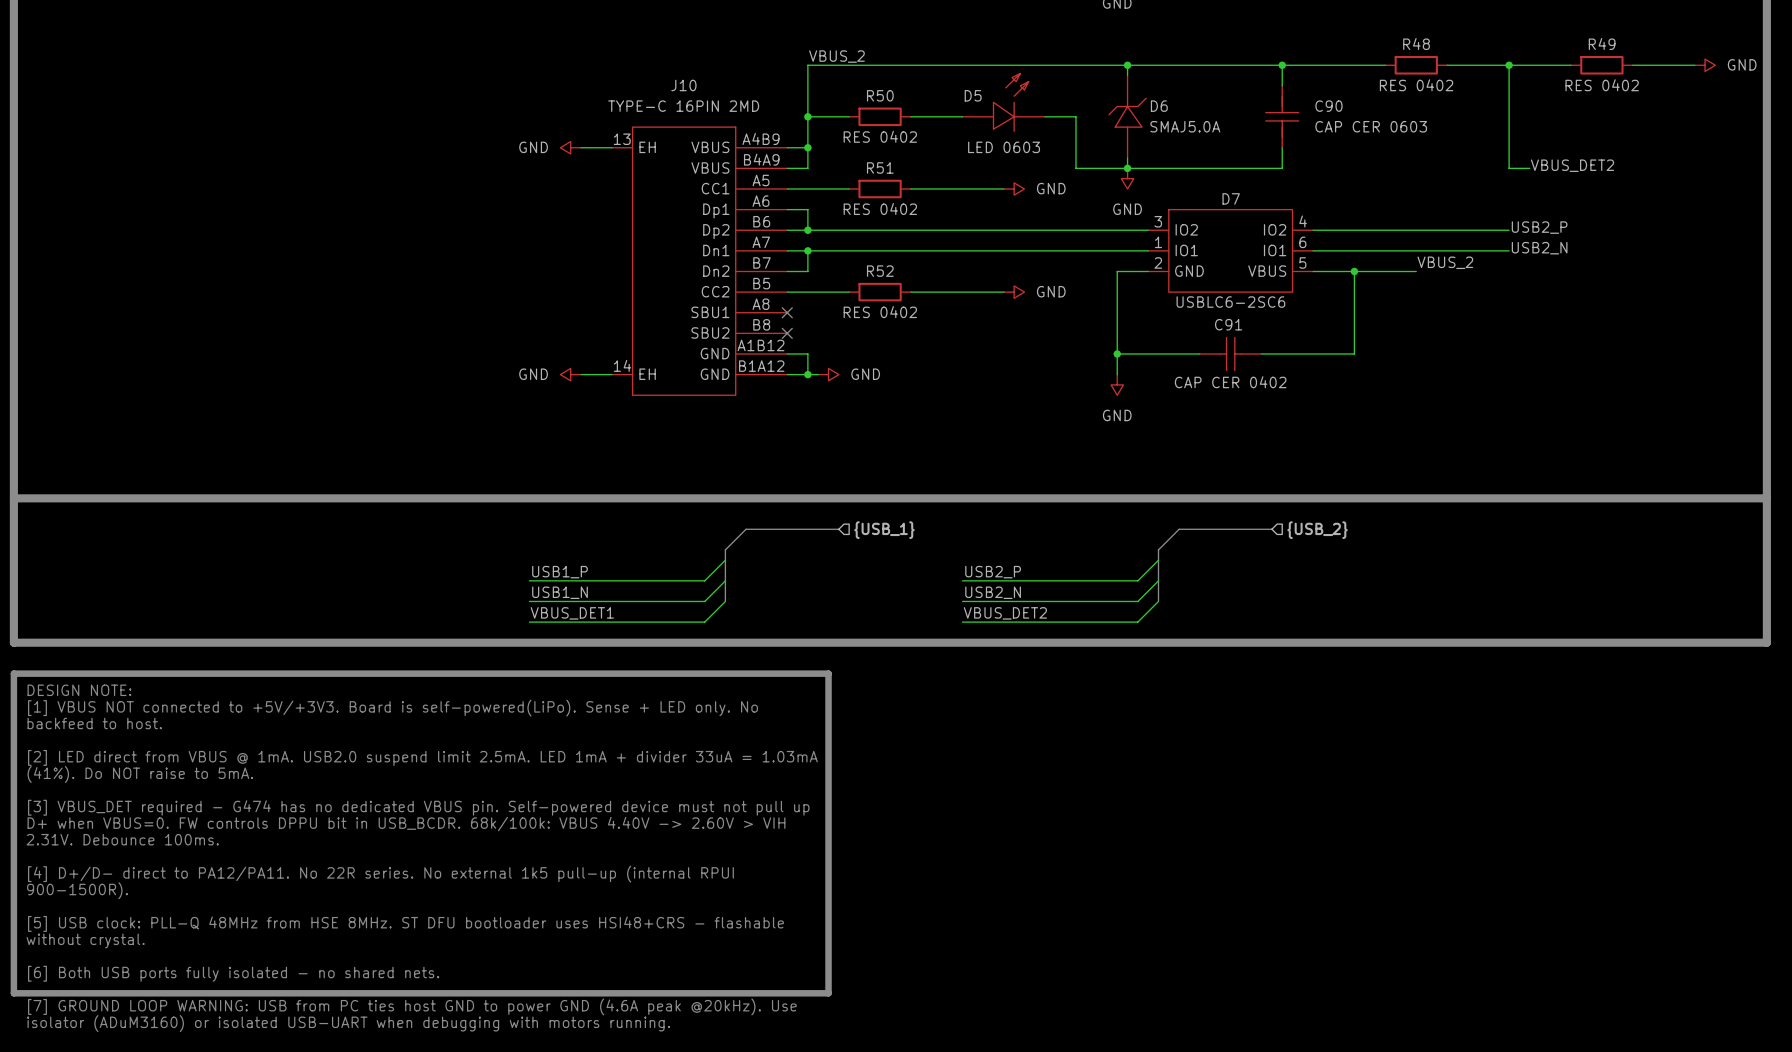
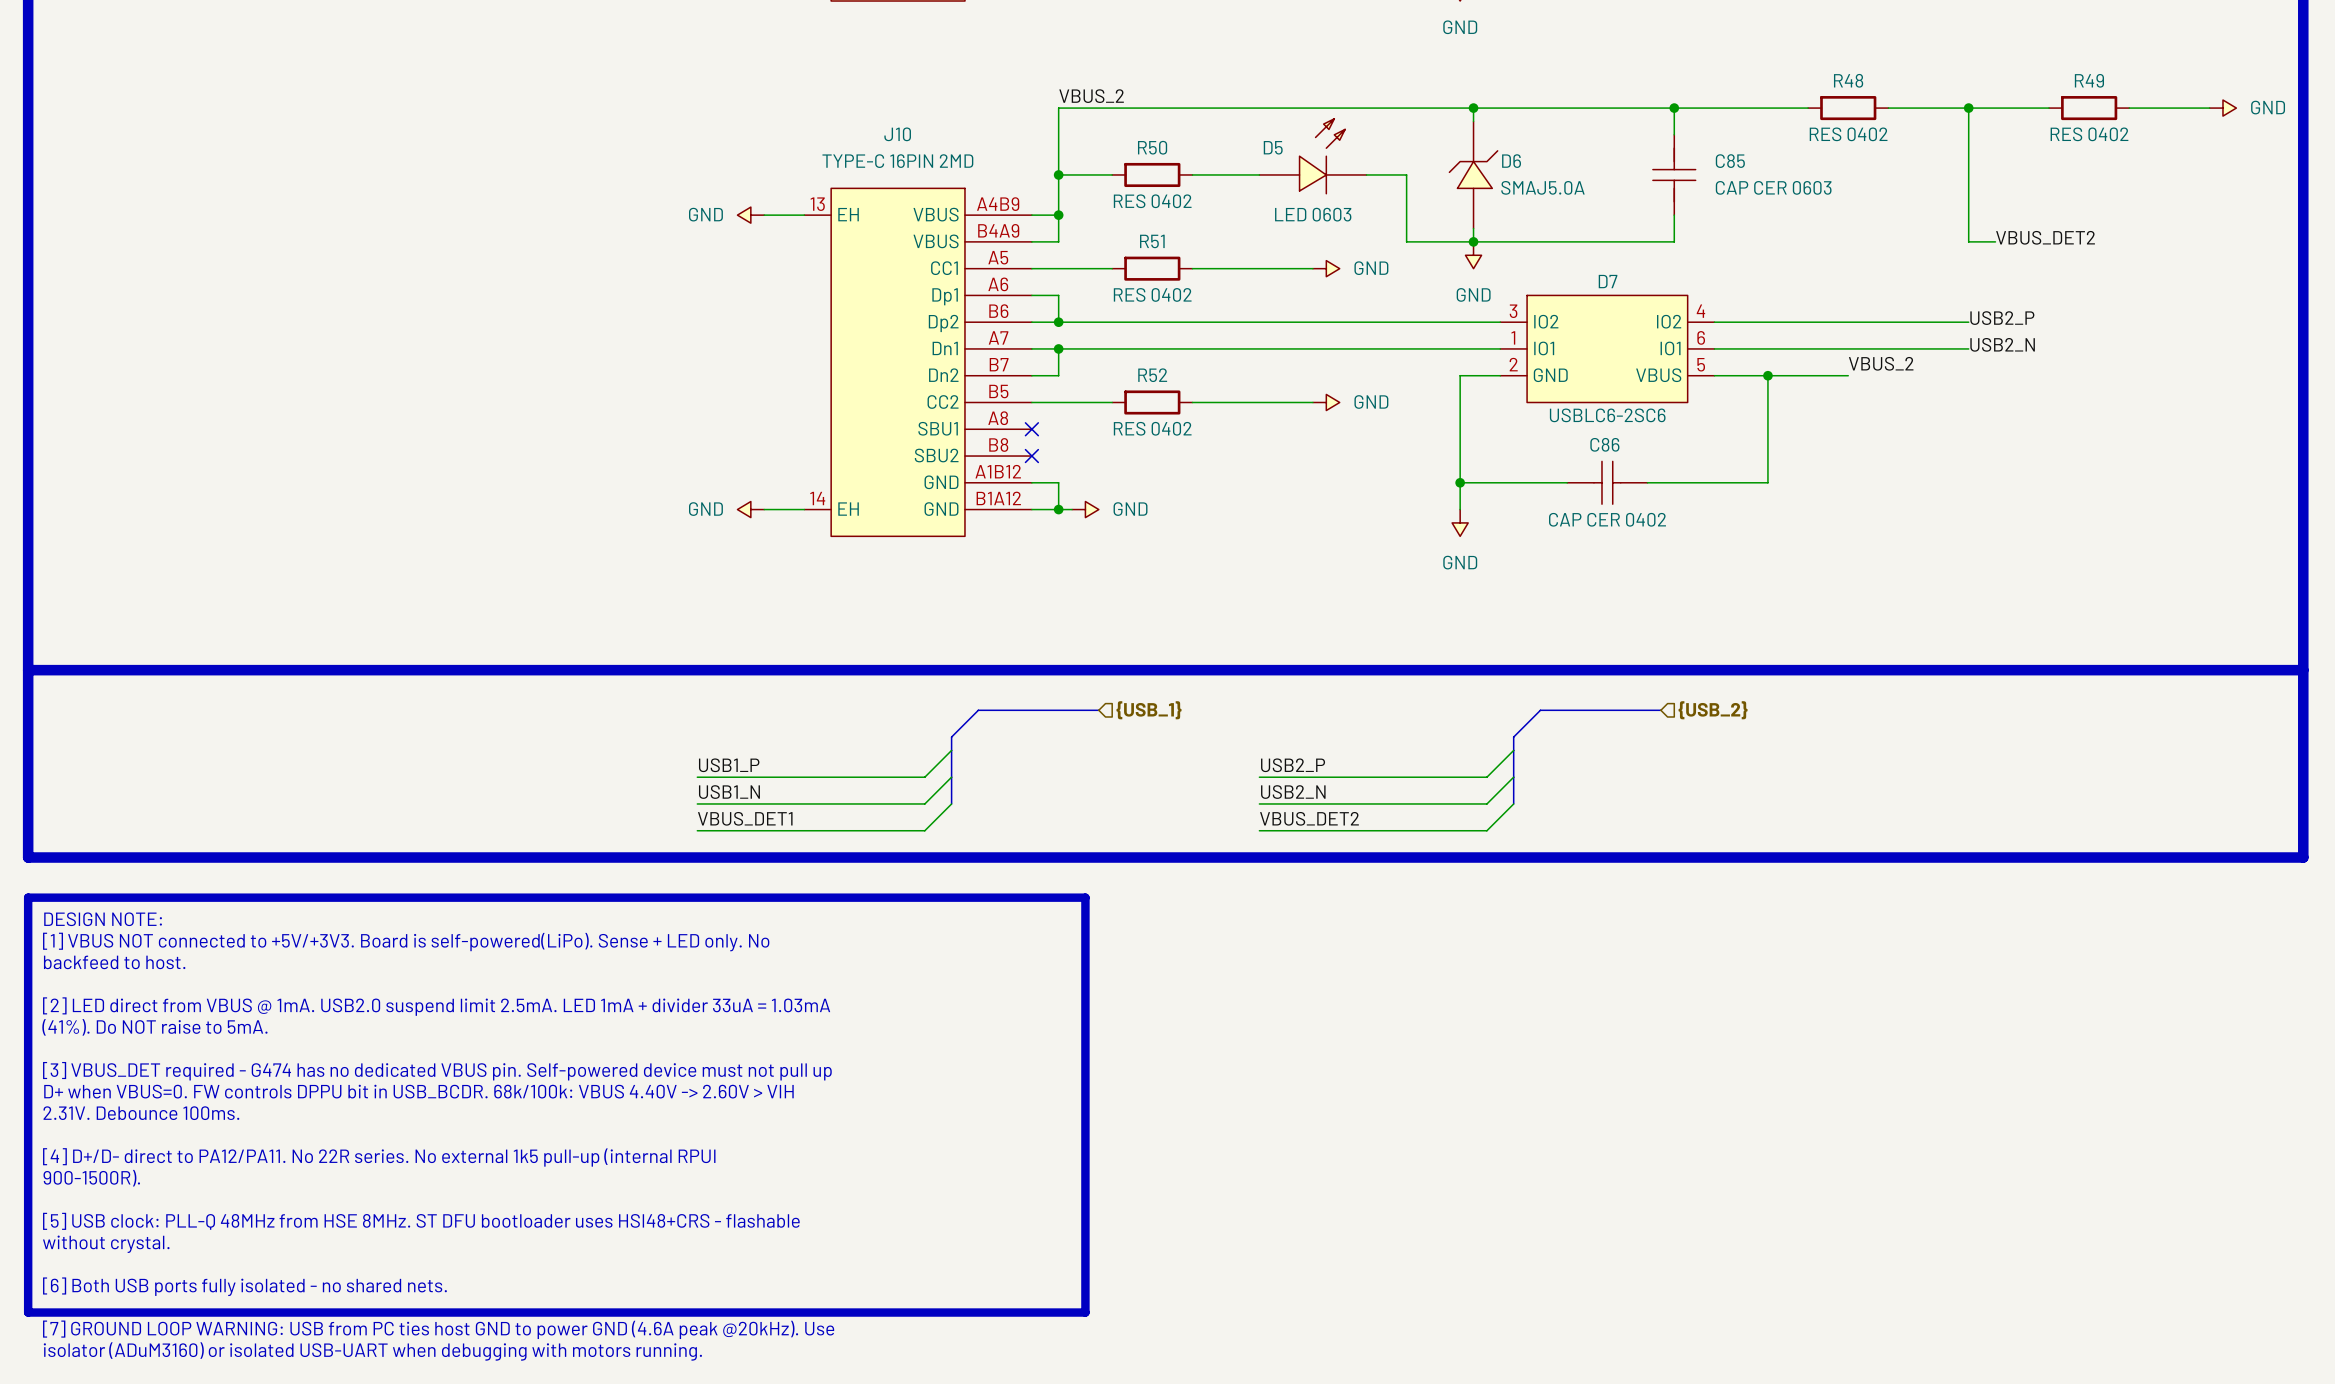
C90 name: C90 (1328, 106) -> C85 (1730, 161)
C91 name: C91 (1228, 324) -> C86 (1604, 444)

